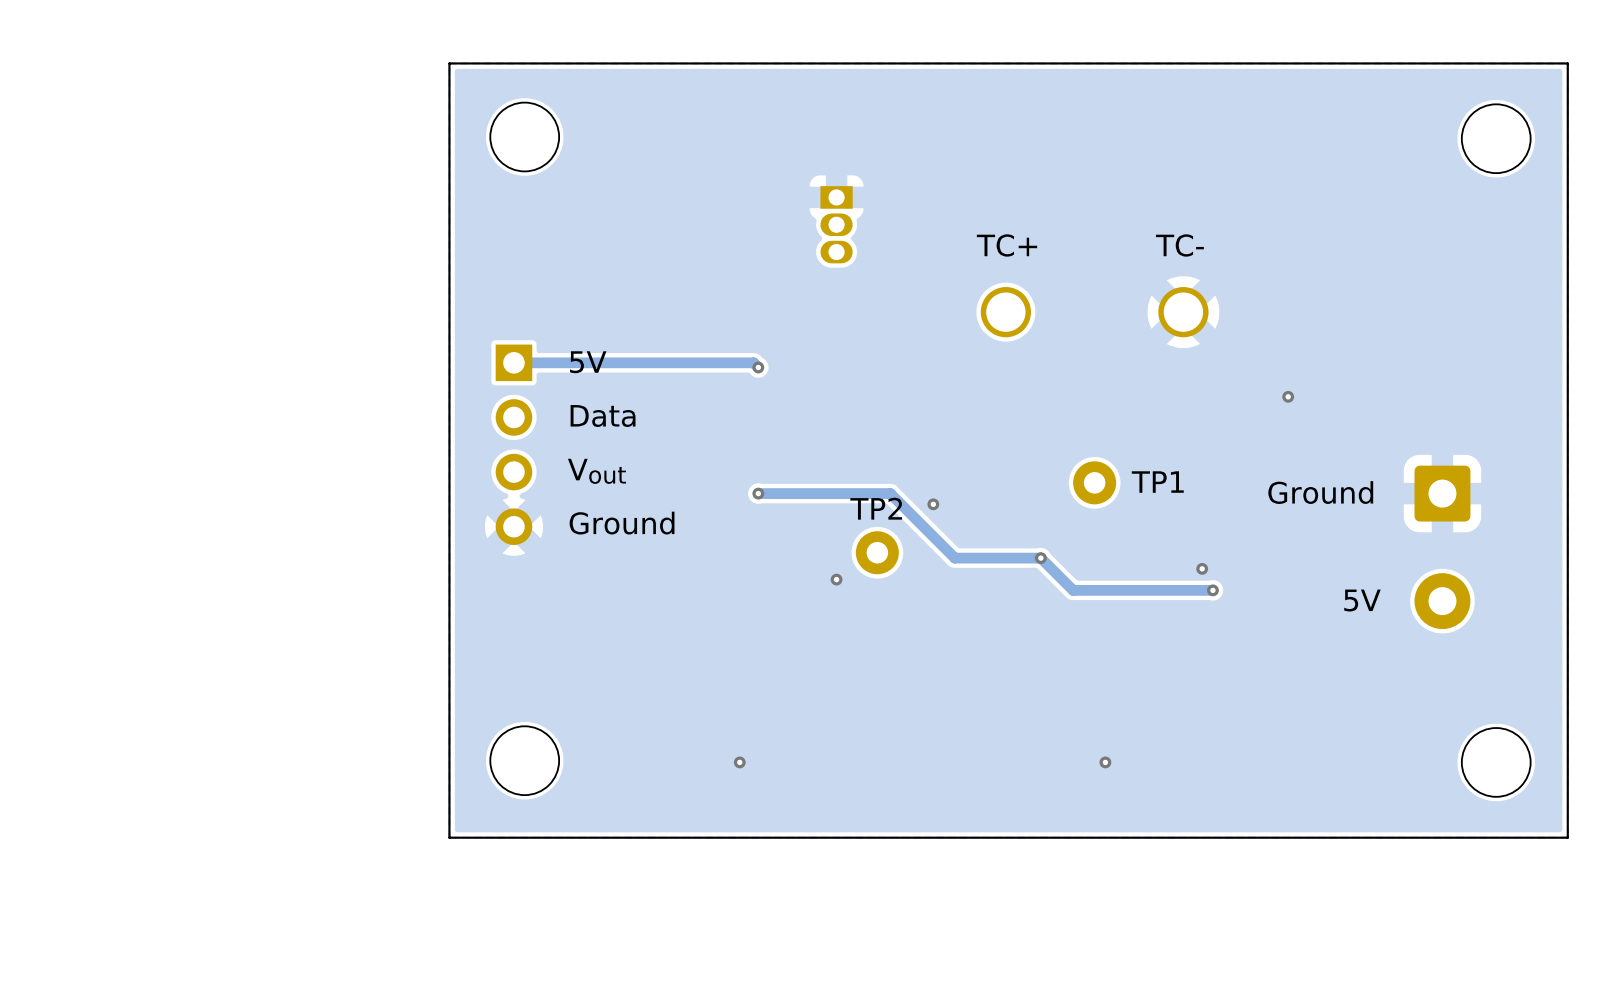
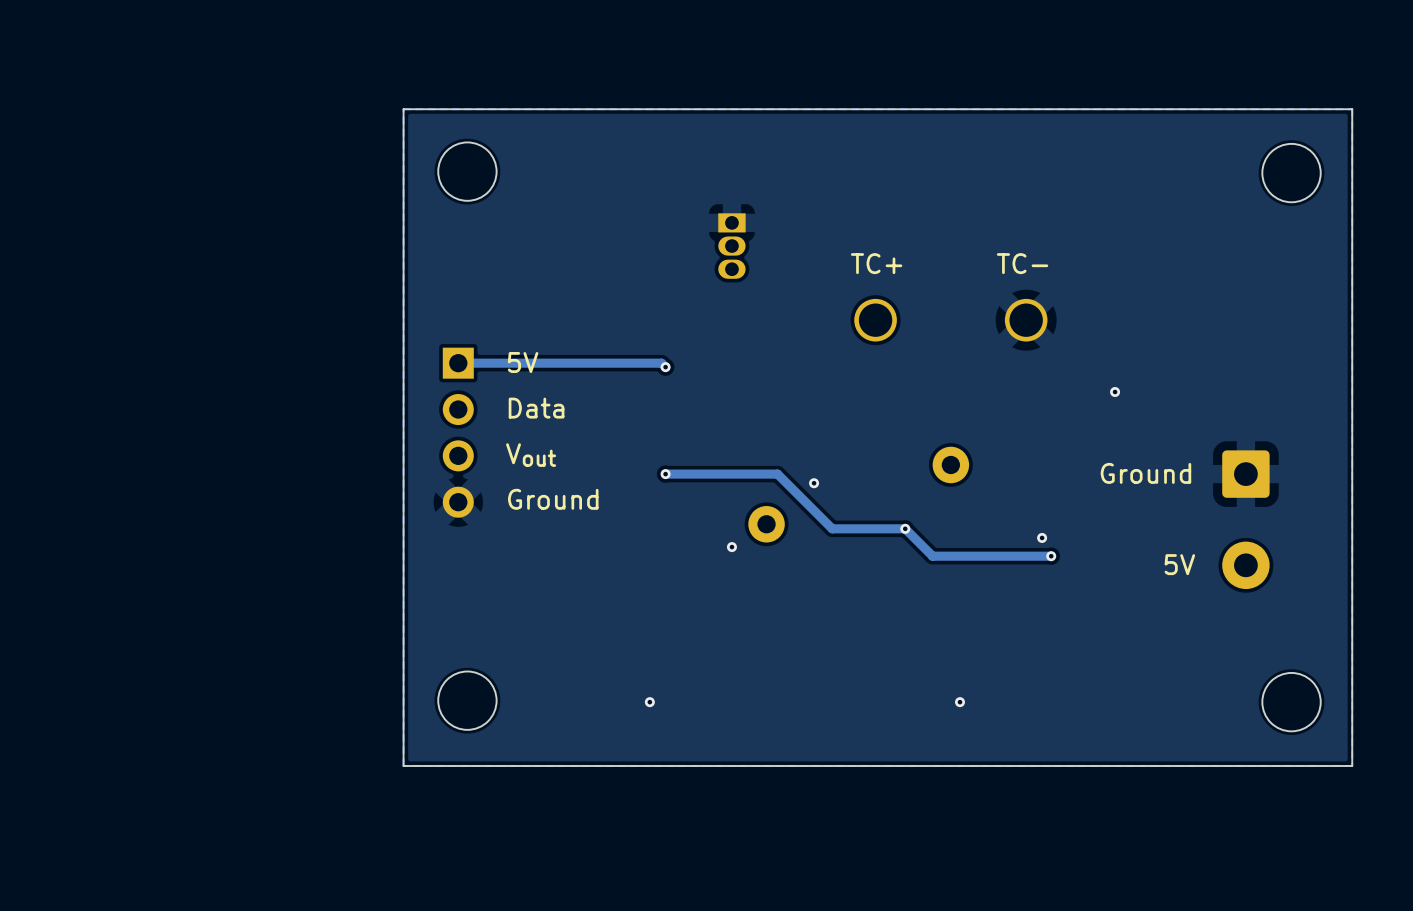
text: TP1 (1157, 482) -> none
text: TP2 (876, 508) -> none

